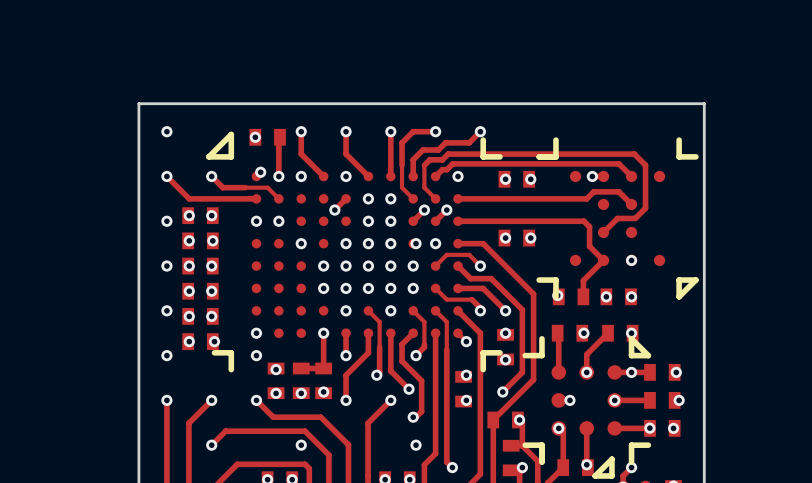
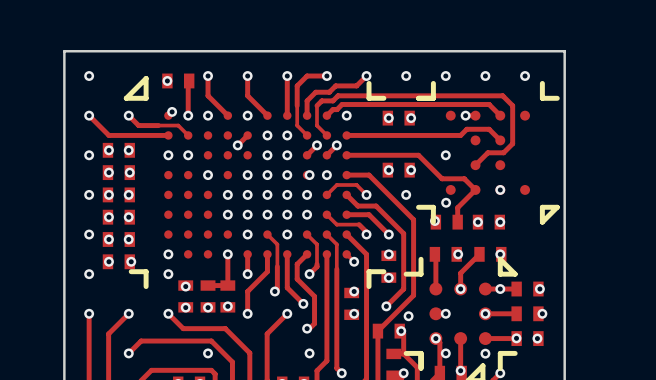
via: none -> (406, 76)
via: none -> (445, 76)
via: none -> (485, 76)
via: none -> (525, 76)
track: (539, 221) (583, 221) (589, 226) (590, 247) -> (418, 155) (442, 178) (464, 178)
via: none -> (445, 155)
via: none -> (406, 194)
via: none -> (446, 202)
via: none -> (408, 316)
via: none -> (445, 353)
via: none -> (485, 353)

